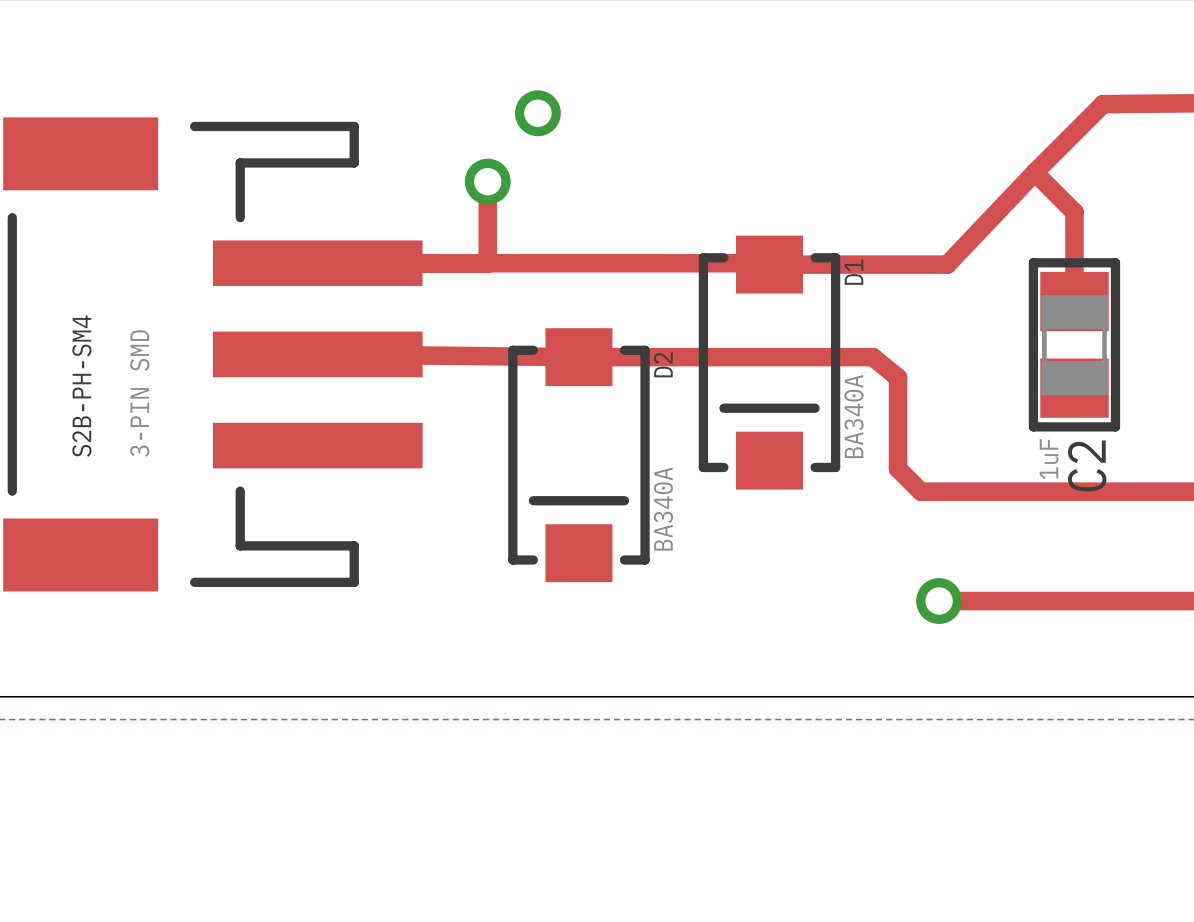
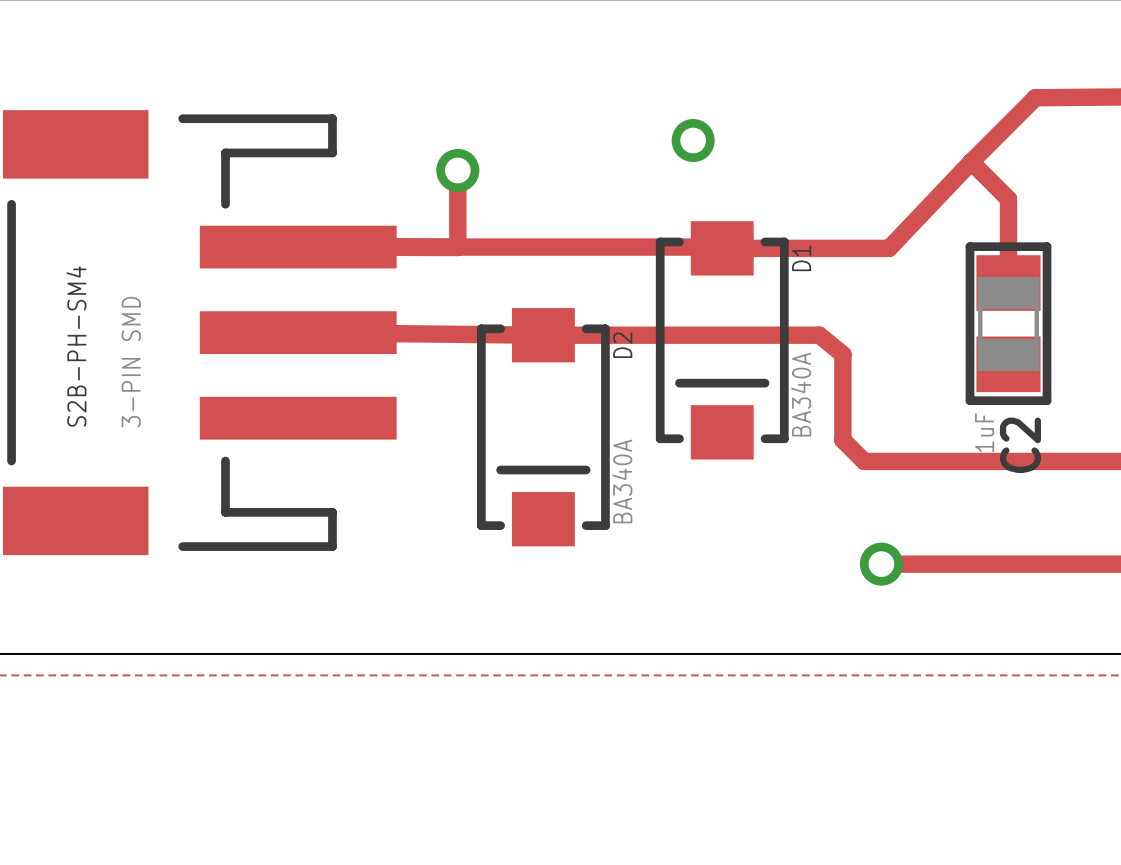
via position: (537, 113) -> (693, 140)

